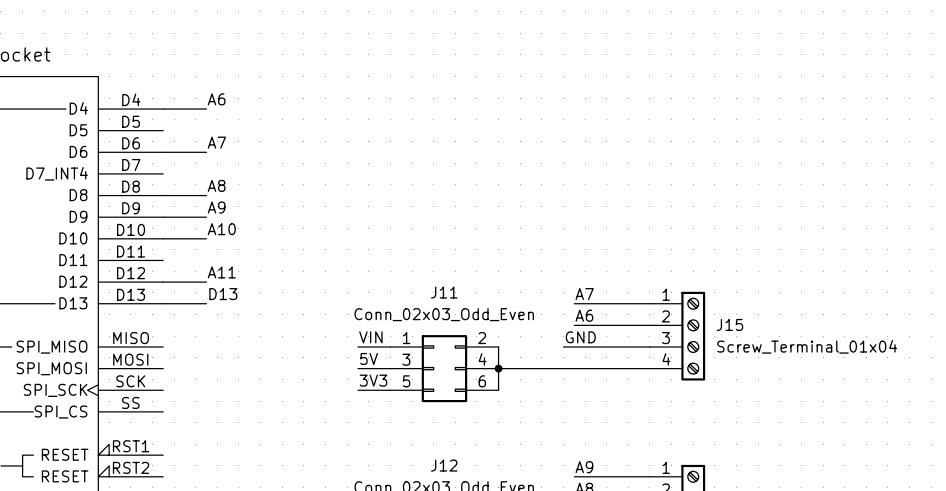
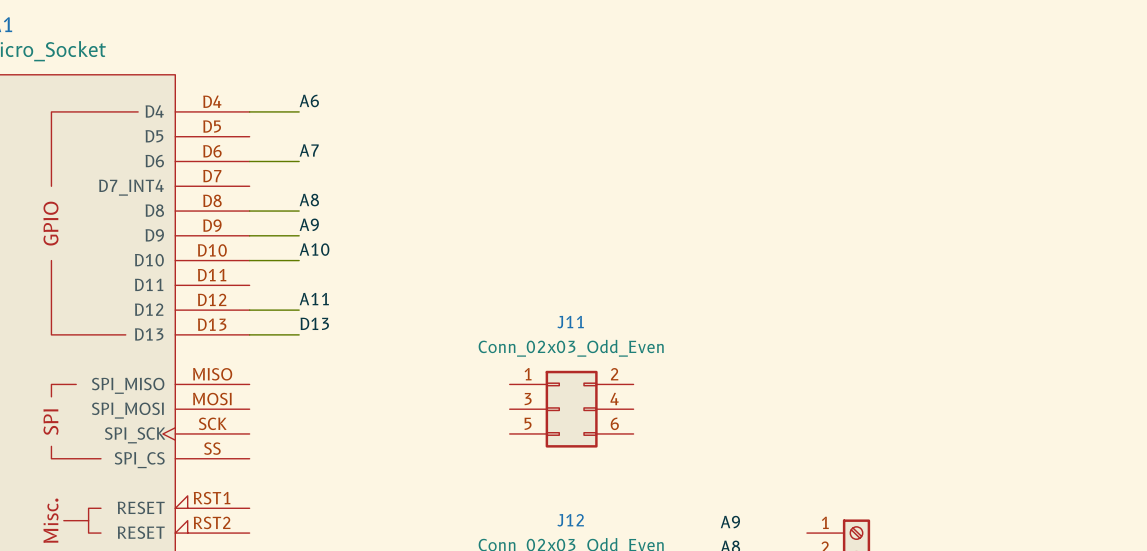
label: A7 (584, 294) -> none
wire: (574, 303) (649, 303) -> none
label: A6 (584, 315) -> none
wire: (574, 325) (649, 325) -> none
J15: Screw_Terminal_01x04 (677, 336) -> none
label: VIN (370, 337) -> none
label: GND (580, 337) -> none
wire: (357, 346) (390, 346) -> none
wire: (498, 346) (498, 390) -> none
wire: (563, 346) (649, 346) -> none
label: 5V (369, 358) -> none
wire: (357, 368) (390, 368) -> none
wire: (498, 368) (649, 368) -> none
junction: (498, 368) -> none
label: 3V3 (373, 380) -> none
wire: (357, 390) (390, 390) -> none
wire: (574, 476) (649, 476) -> none

